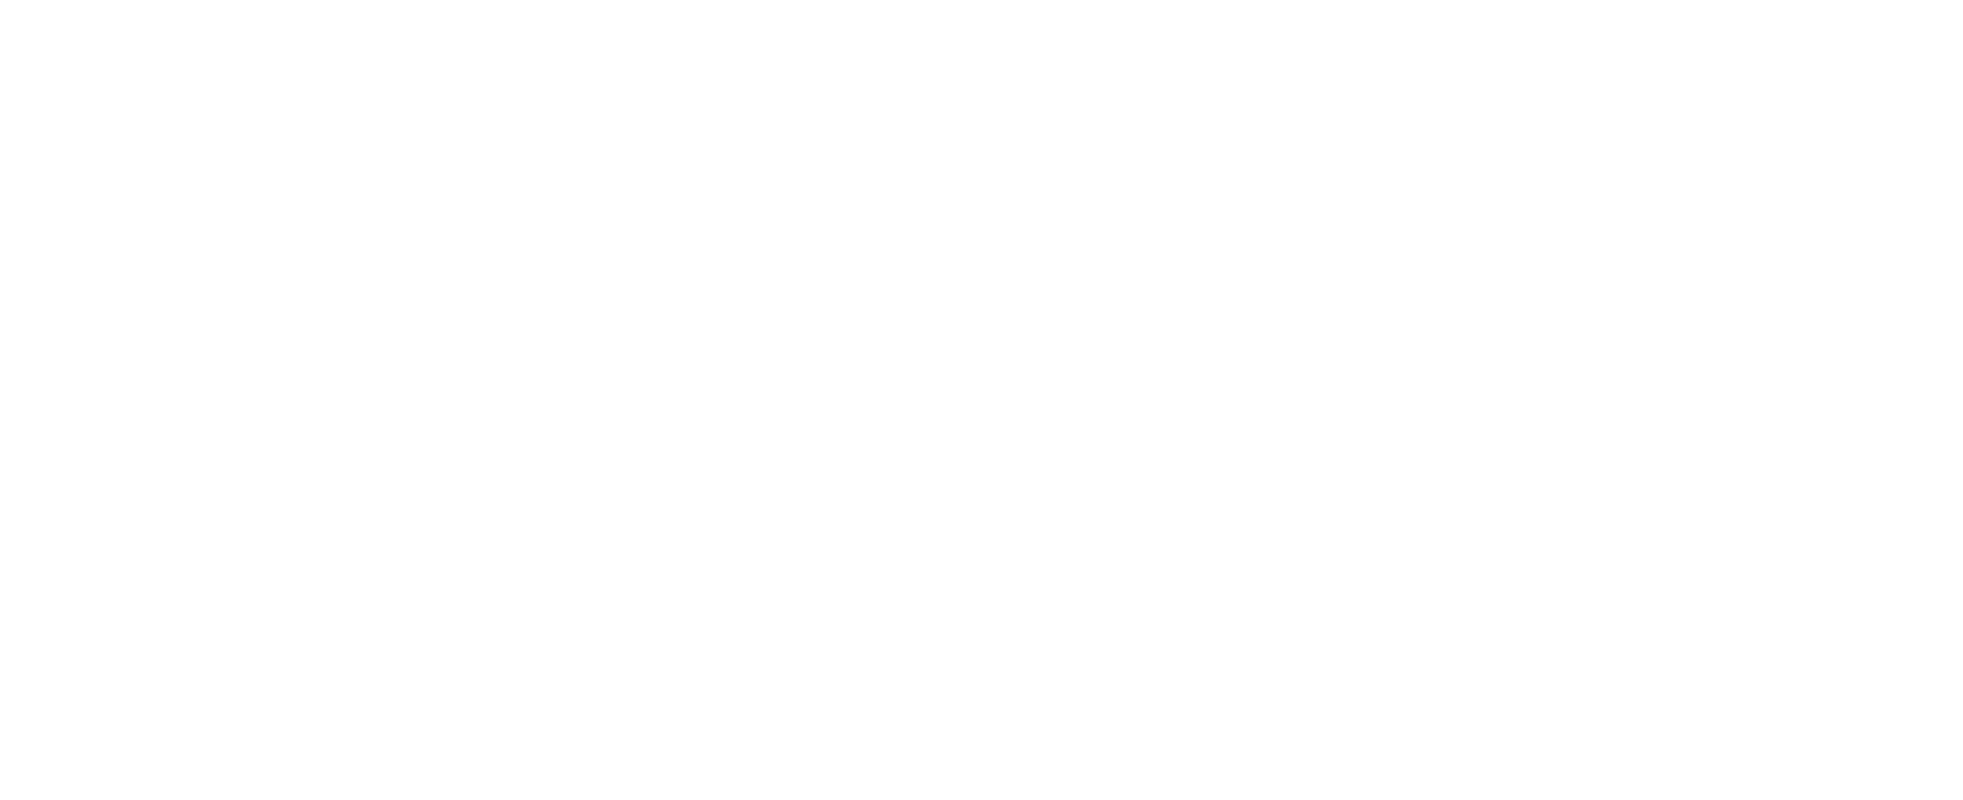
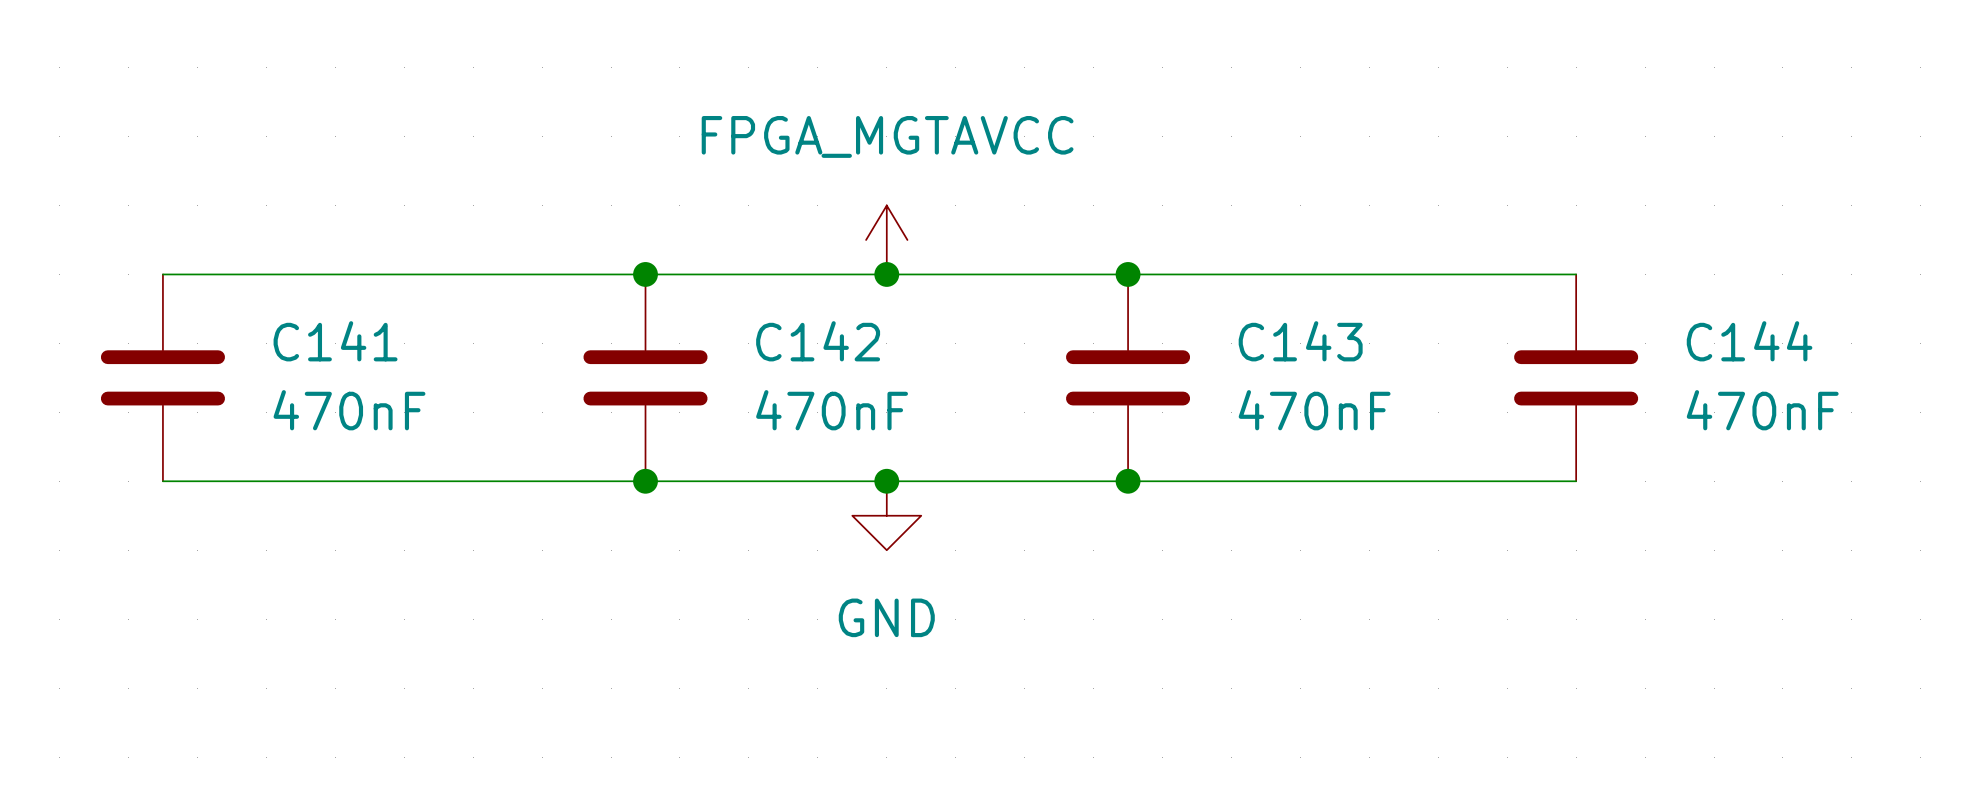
power symbol: none -> FPGA_MGTAVCC (886, 239)
wire: none -> (162, 274) (1576, 274)
junction: none -> (645, 274)
junction: none -> (886, 274)
junction: none -> (1128, 274)
C141: none -> 470nF (162, 377)
C142: none -> 470nF (645, 377)
C143: none -> 470nF (1128, 377)
C144: none -> 470nF (1576, 377)
wire: none -> (162, 481) (1576, 481)
junction: none -> (645, 481)
junction: none -> (886, 481)
junction: none -> (1128, 481)
power symbol: none -> GND (886, 515)

